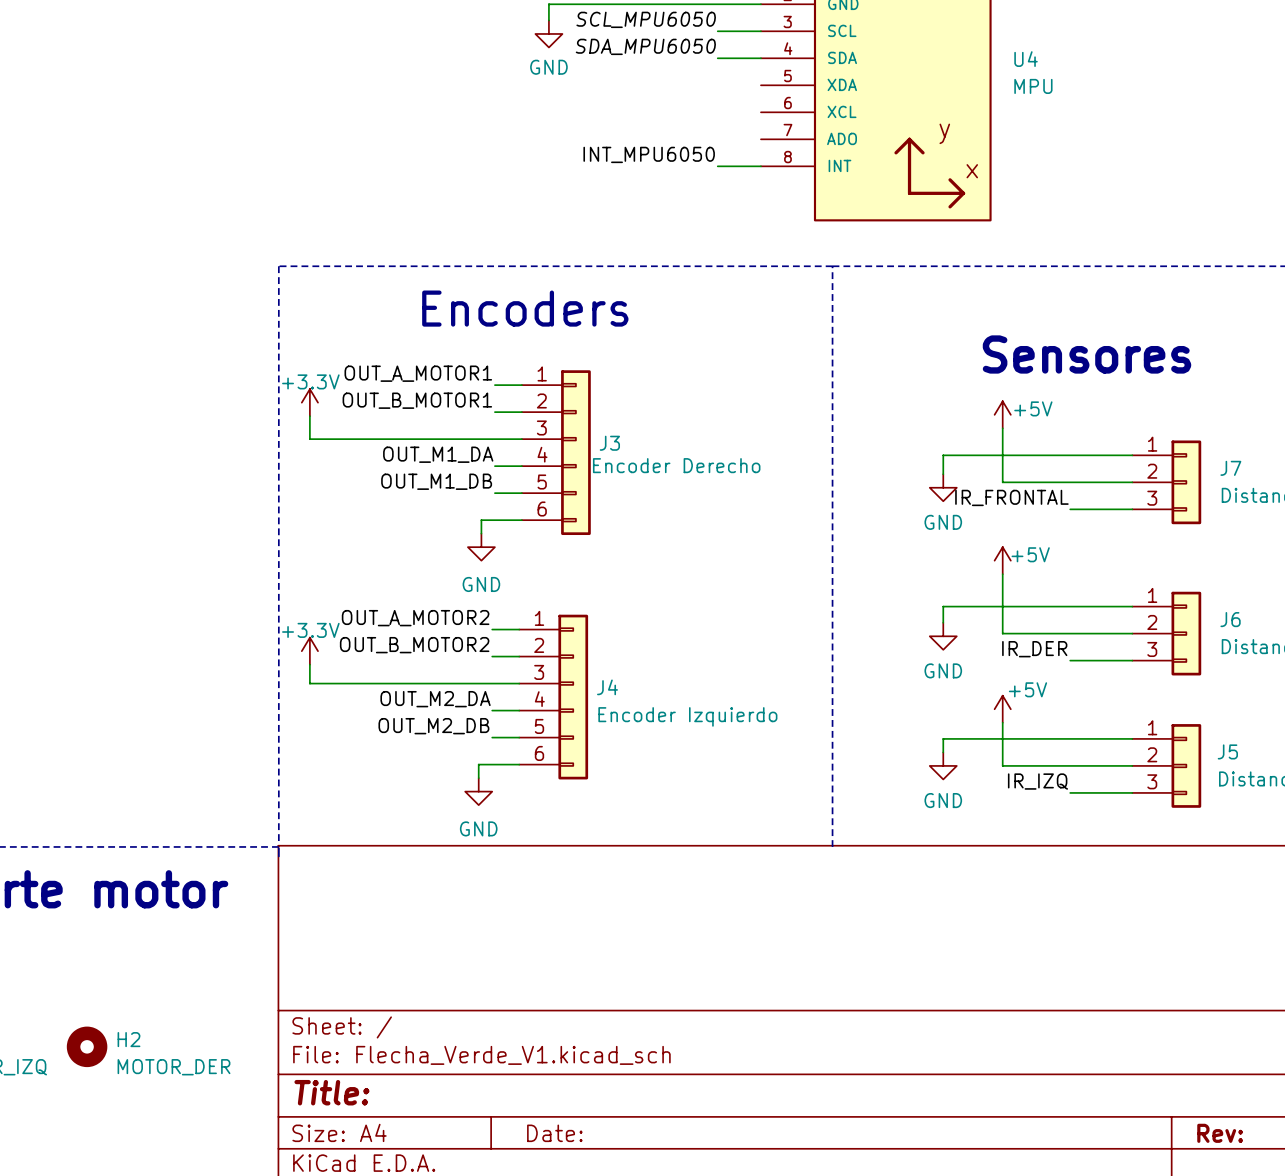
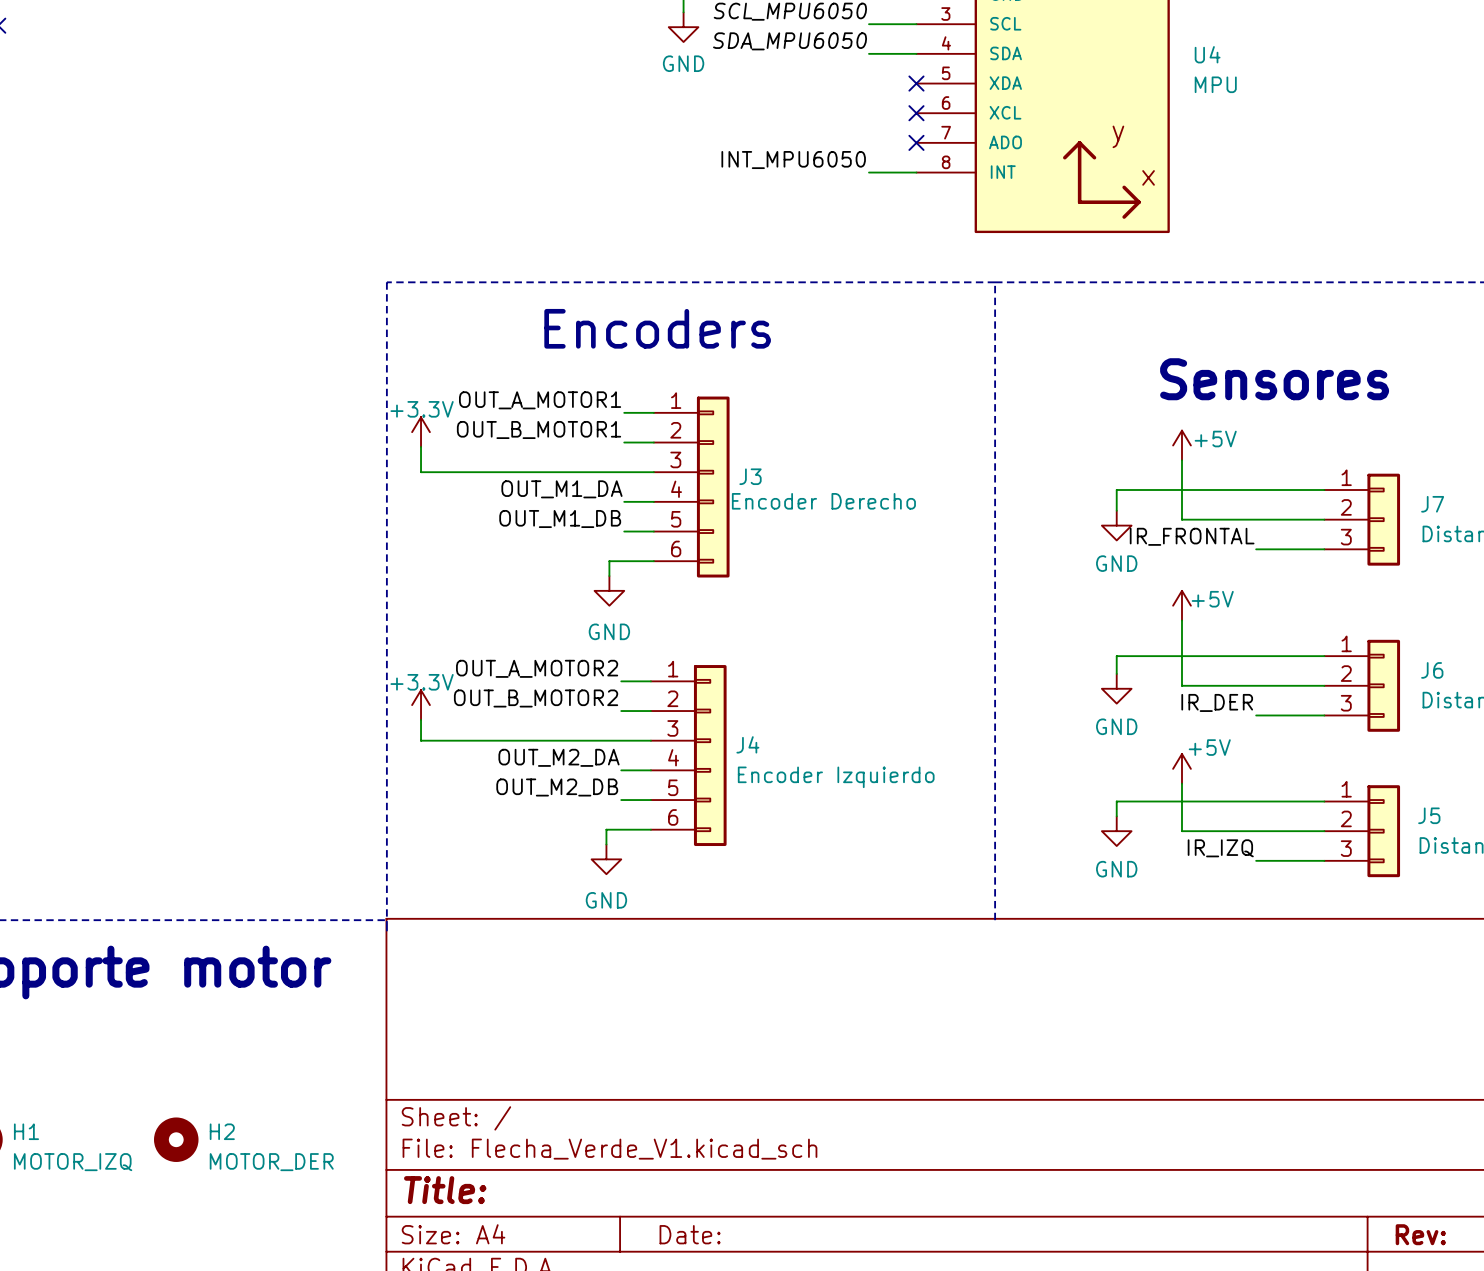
no-connect mark: none -> (916, 83)
no-connect mark: none -> (916, 113)
no-connect mark: none -> (916, 142)

